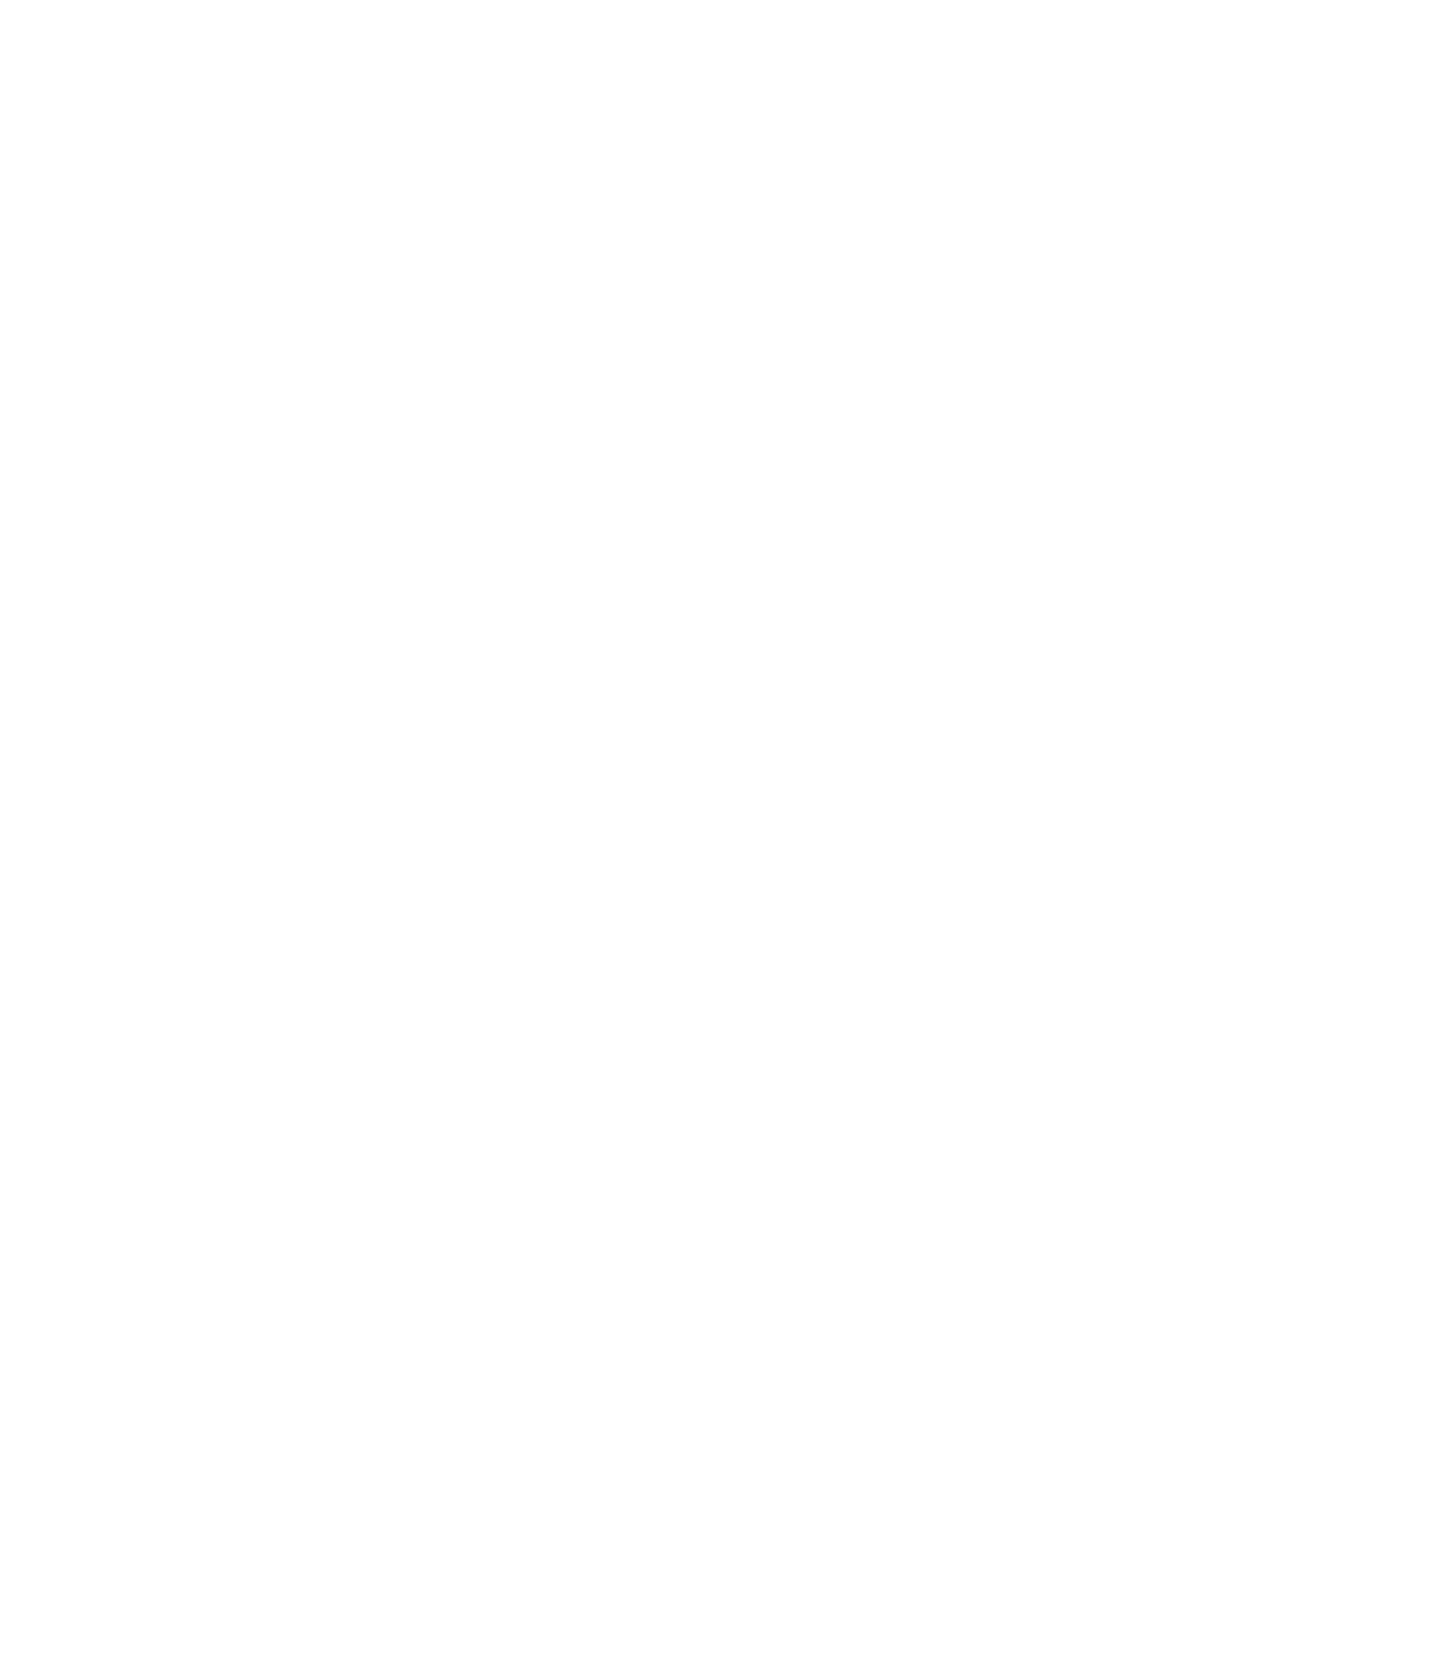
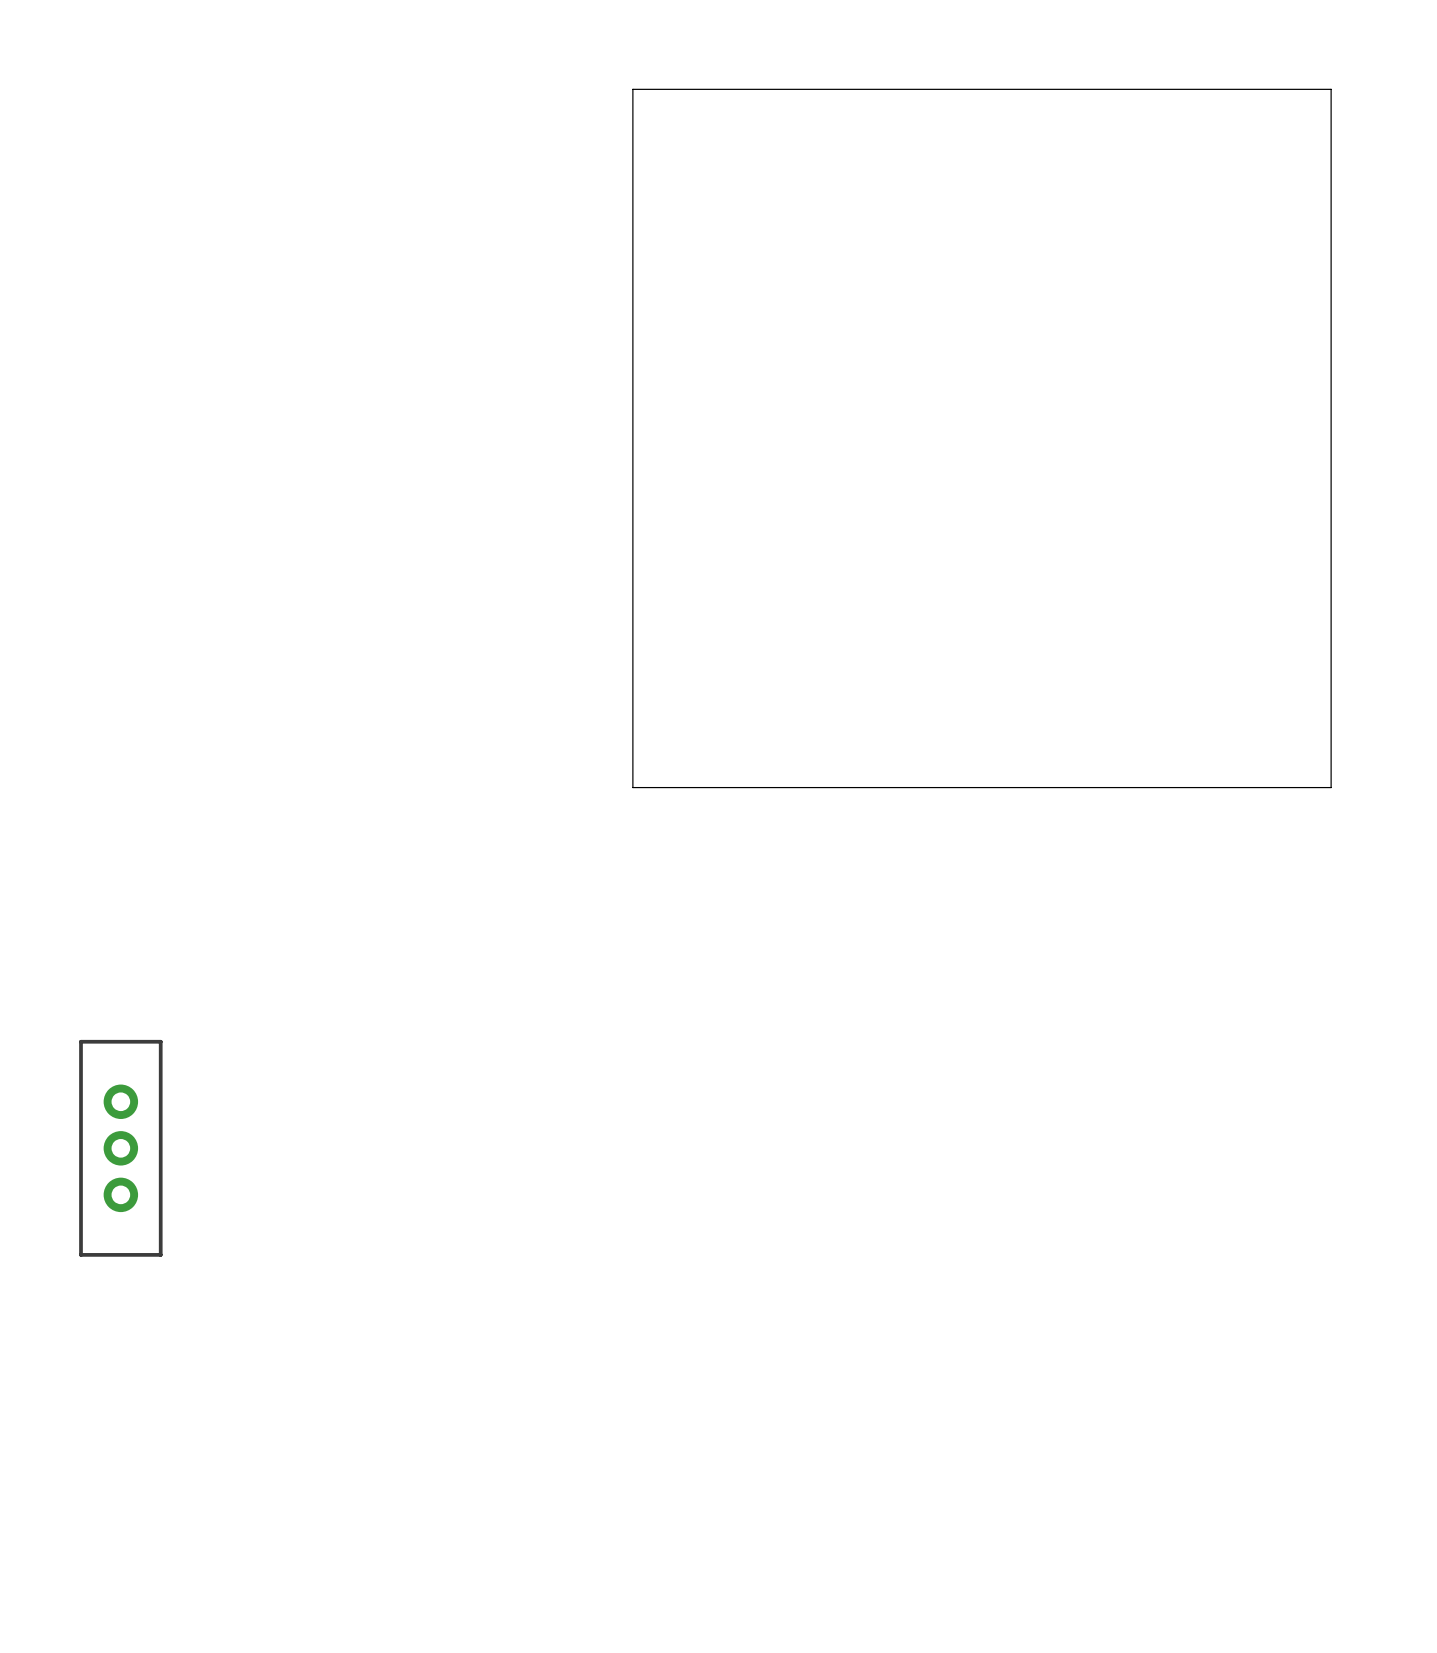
board edge: none -> (632, 89) (1331, 89) (1331, 787) (632, 787) (632, 89)
part: none -> (120, 1148)

